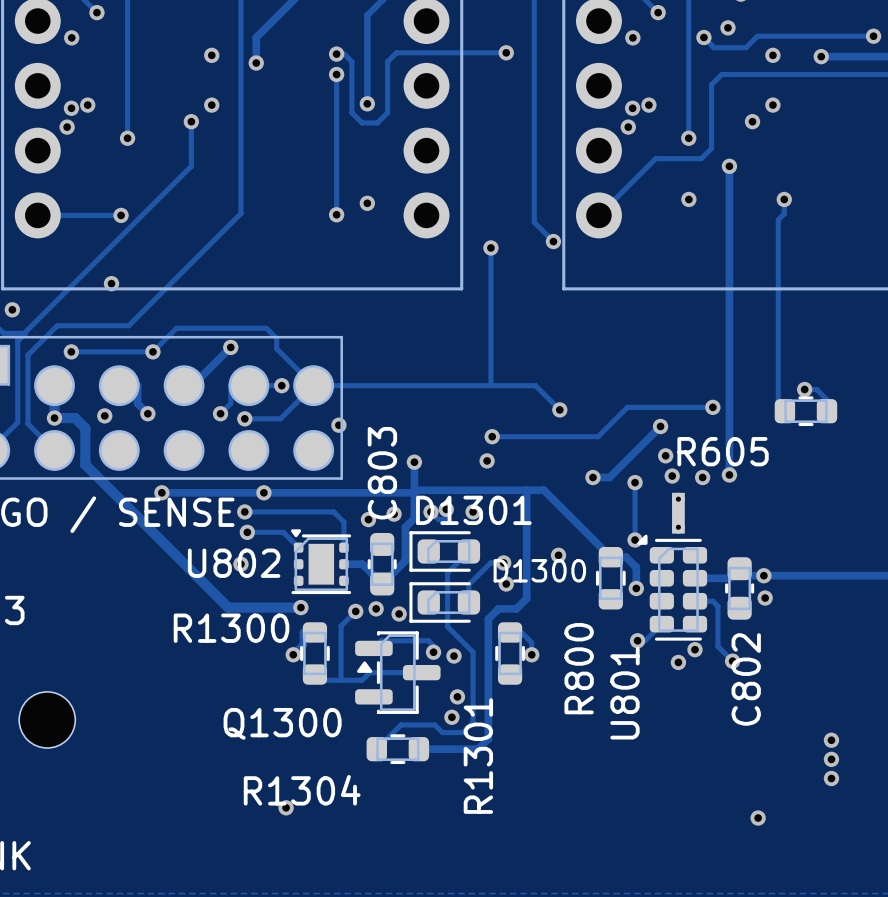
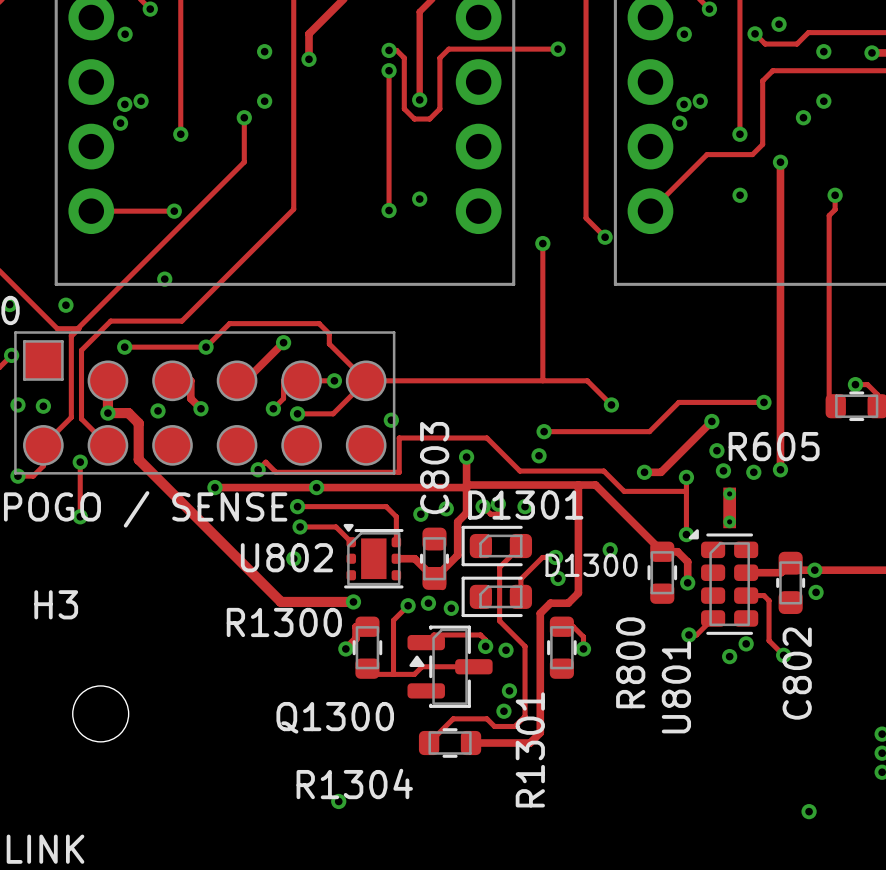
track: none -> (80, 462) (80, 516)
via: none -> (80, 462)
track: none -> (258, 469) (265, 462) (275, 472) (399, 472) (399, 438) (486, 438) (519, 471) (603, 471) (624, 491) (686, 491)
via: none -> (258, 469)
via: none -> (80, 516)

